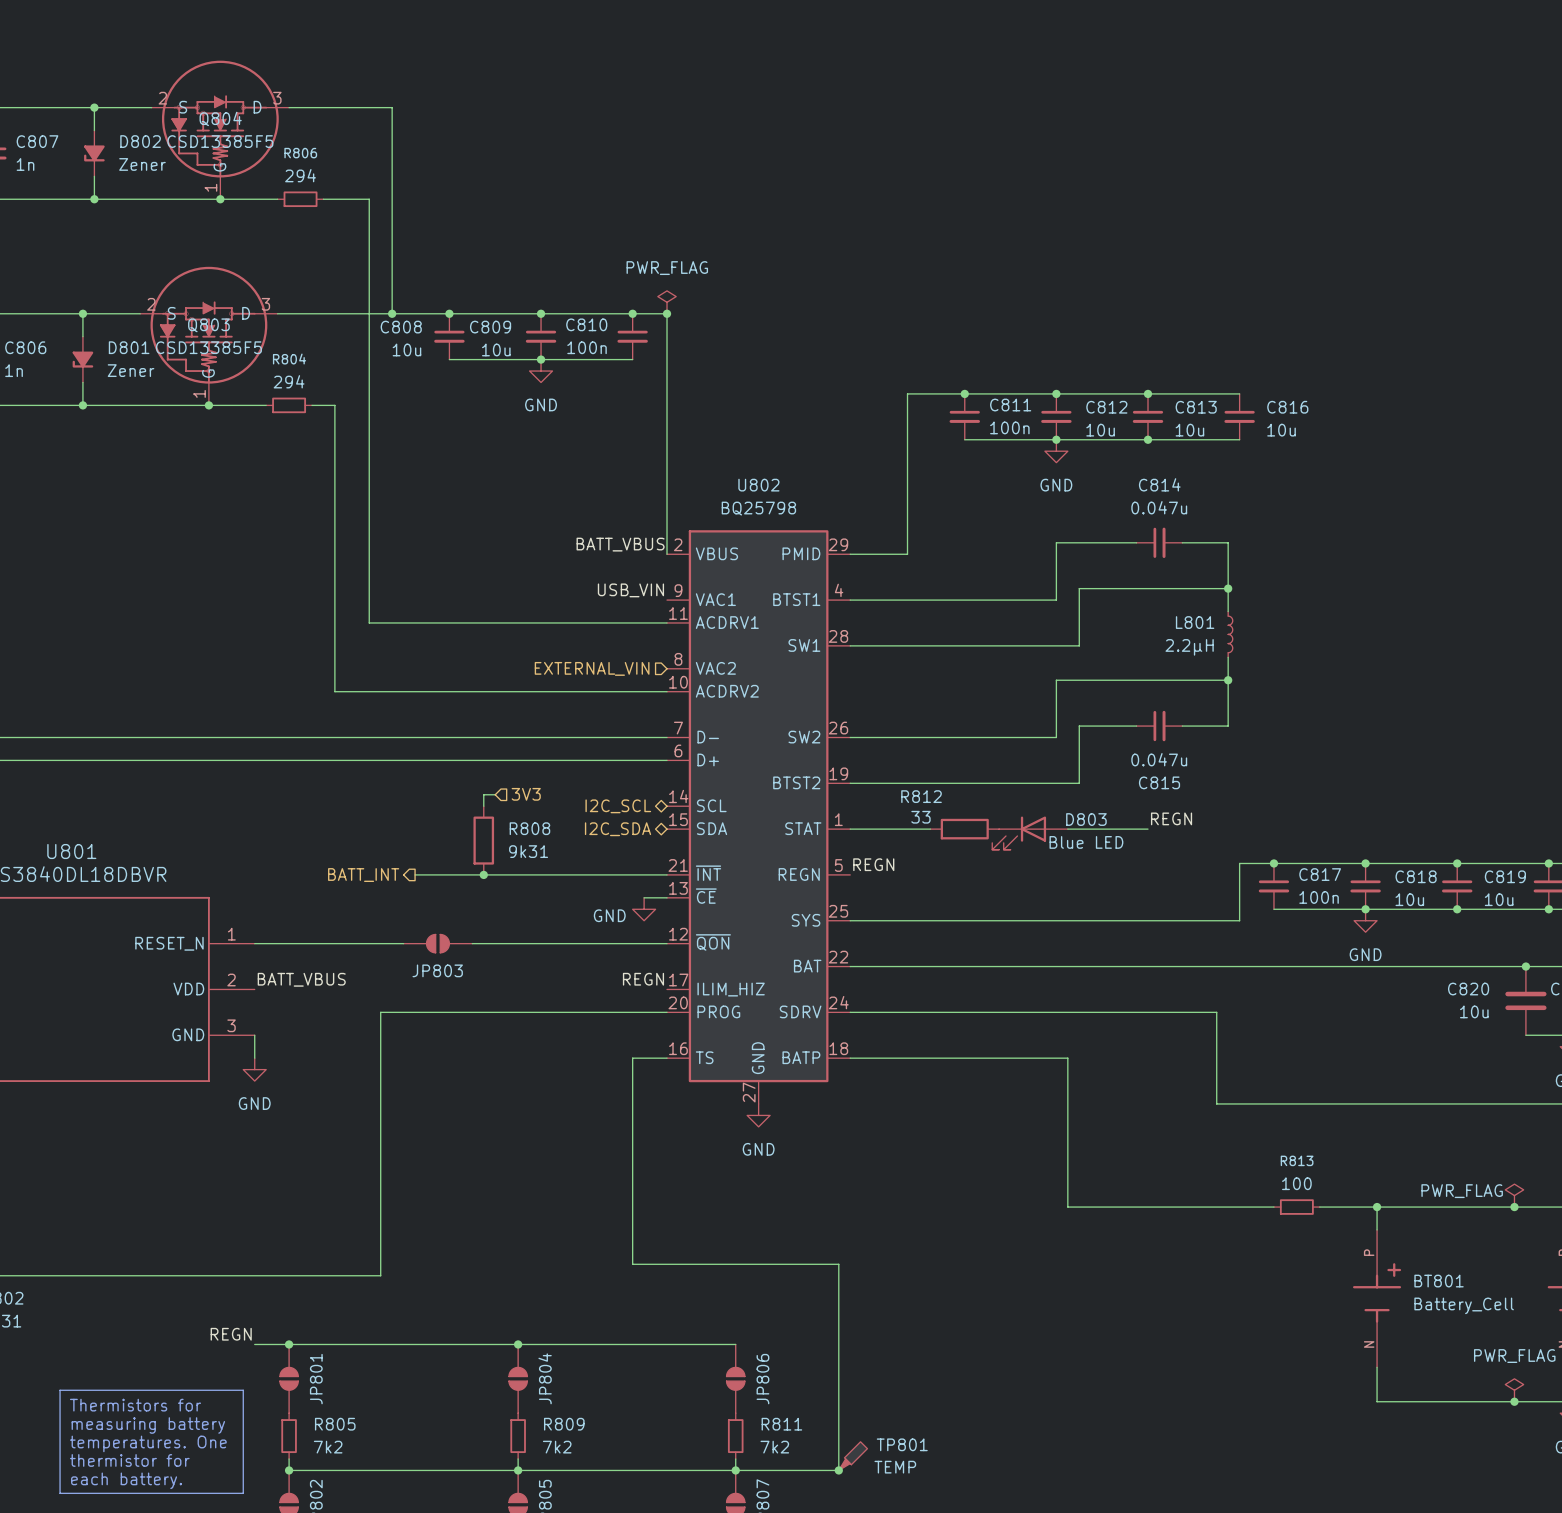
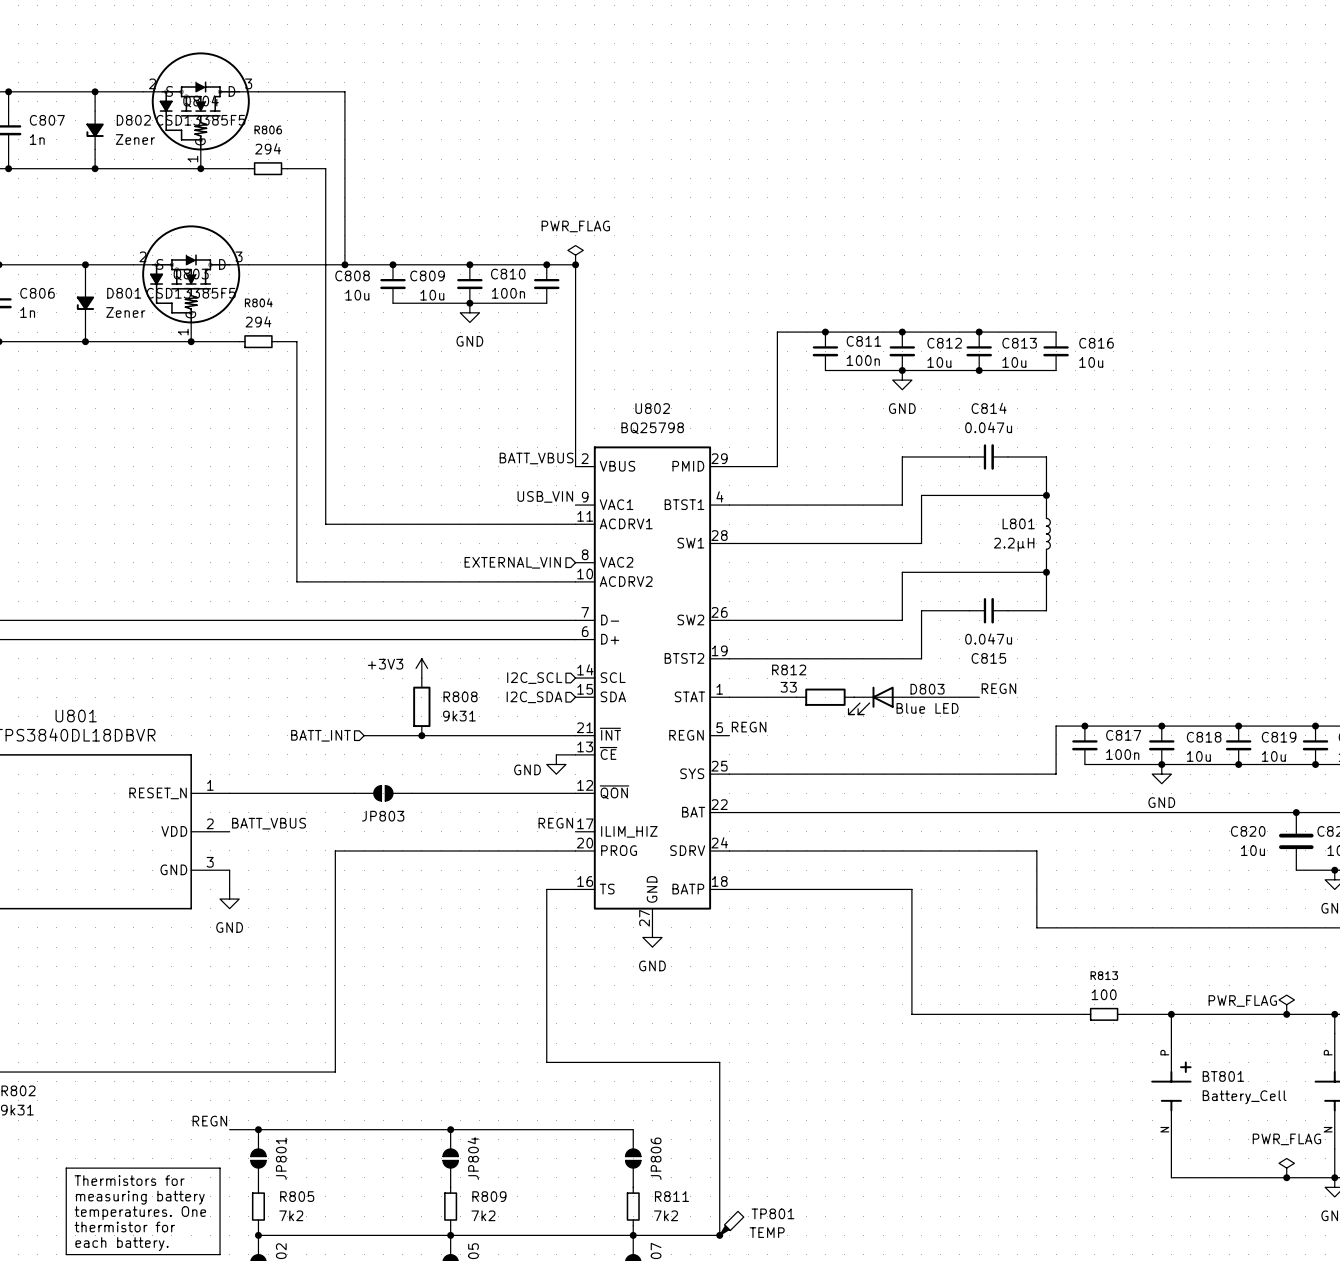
power symbol: none -> +3V3 (421, 668)
hierarchical label: 3V3 (526, 794) -> none
hierarchical label shape: bidirectional (618, 806) -> input (534, 678)
hierarchical label shape: bidirectional (618, 829) -> input (534, 697)
hierarchical label shape: output (363, 875) -> input (321, 735)

